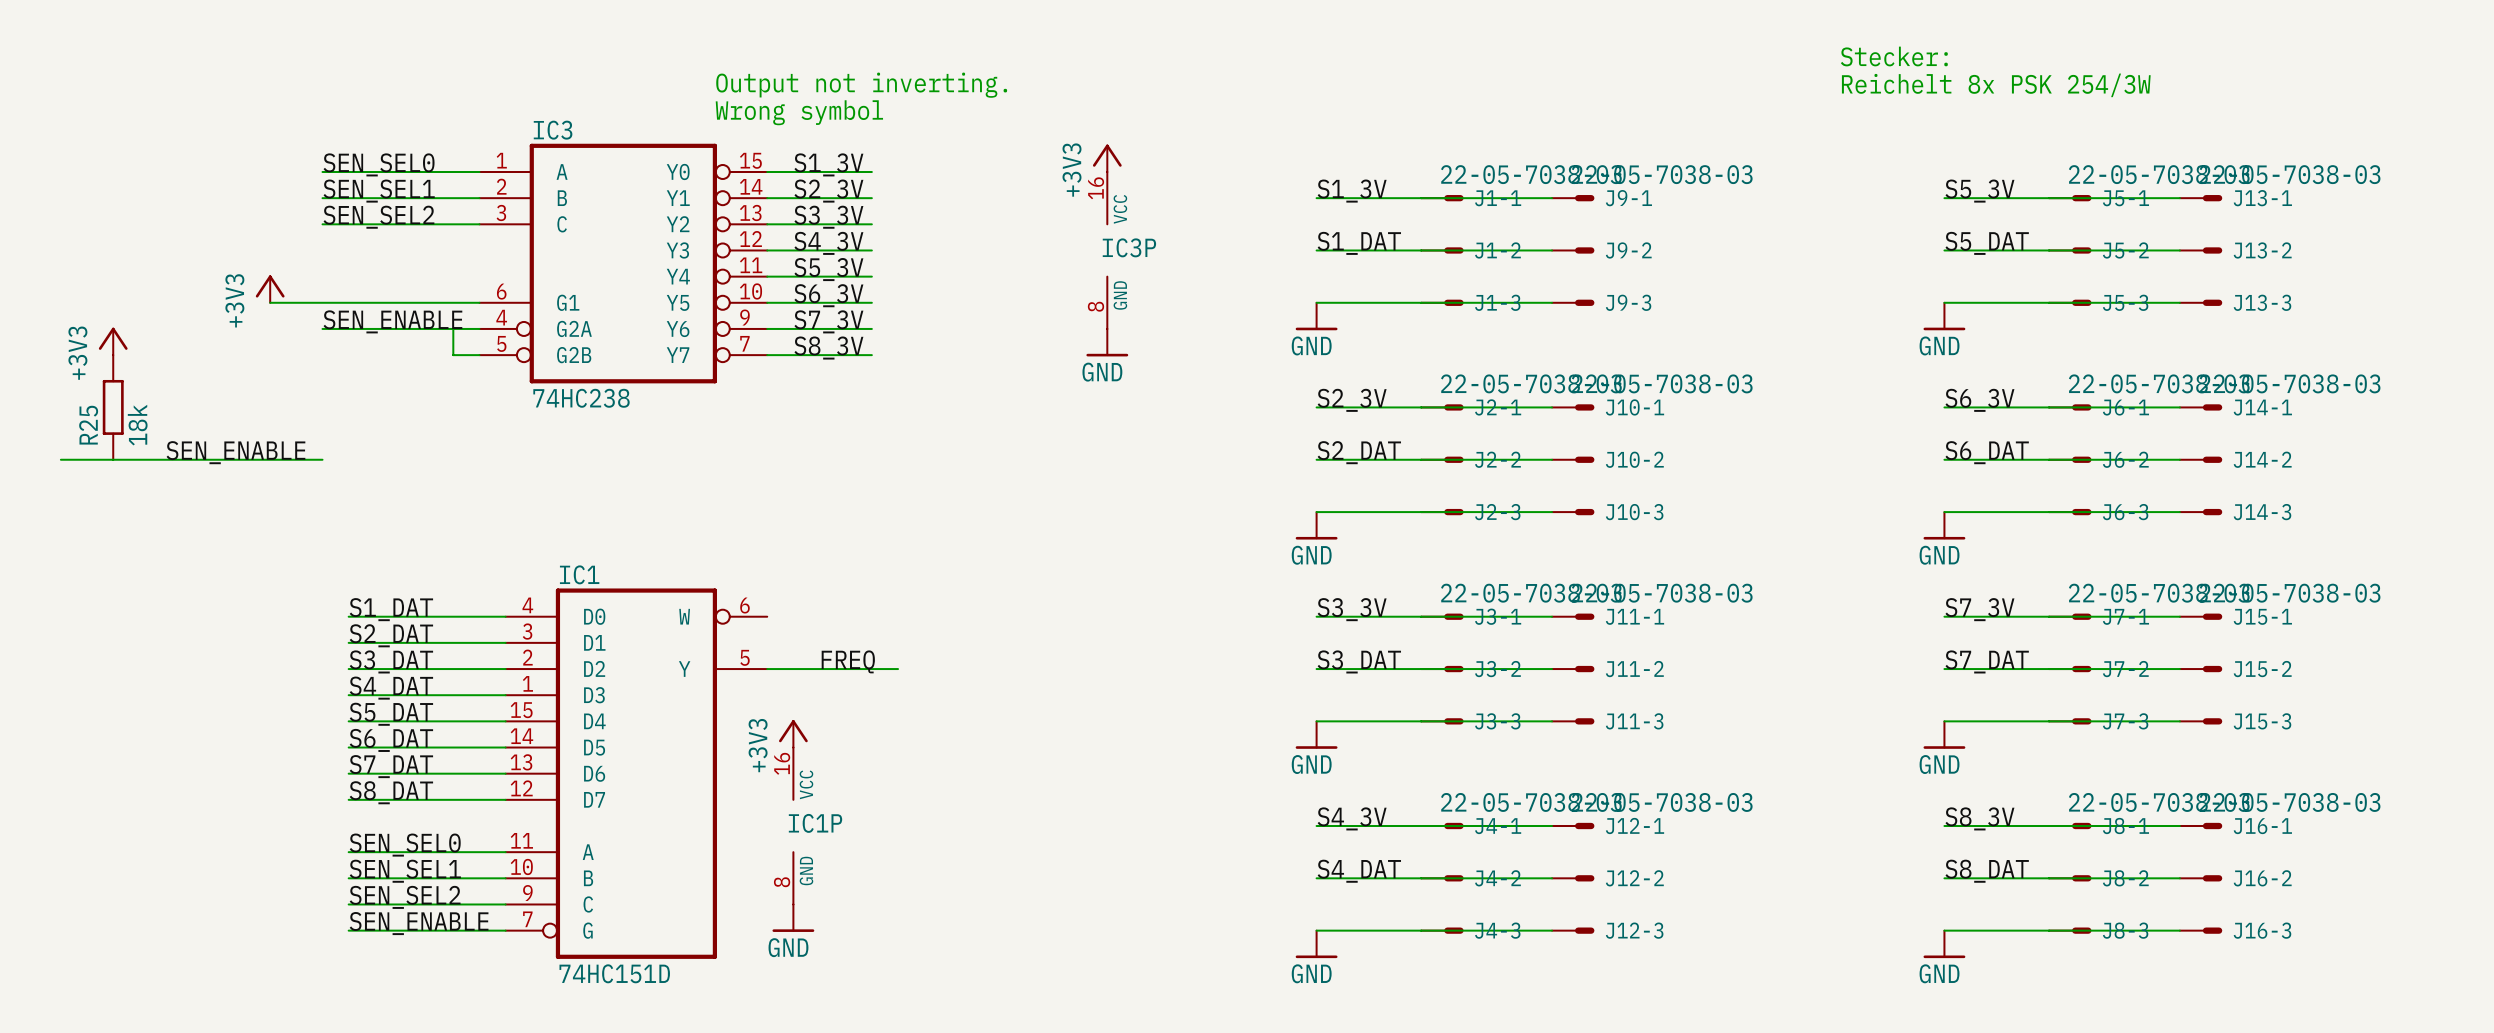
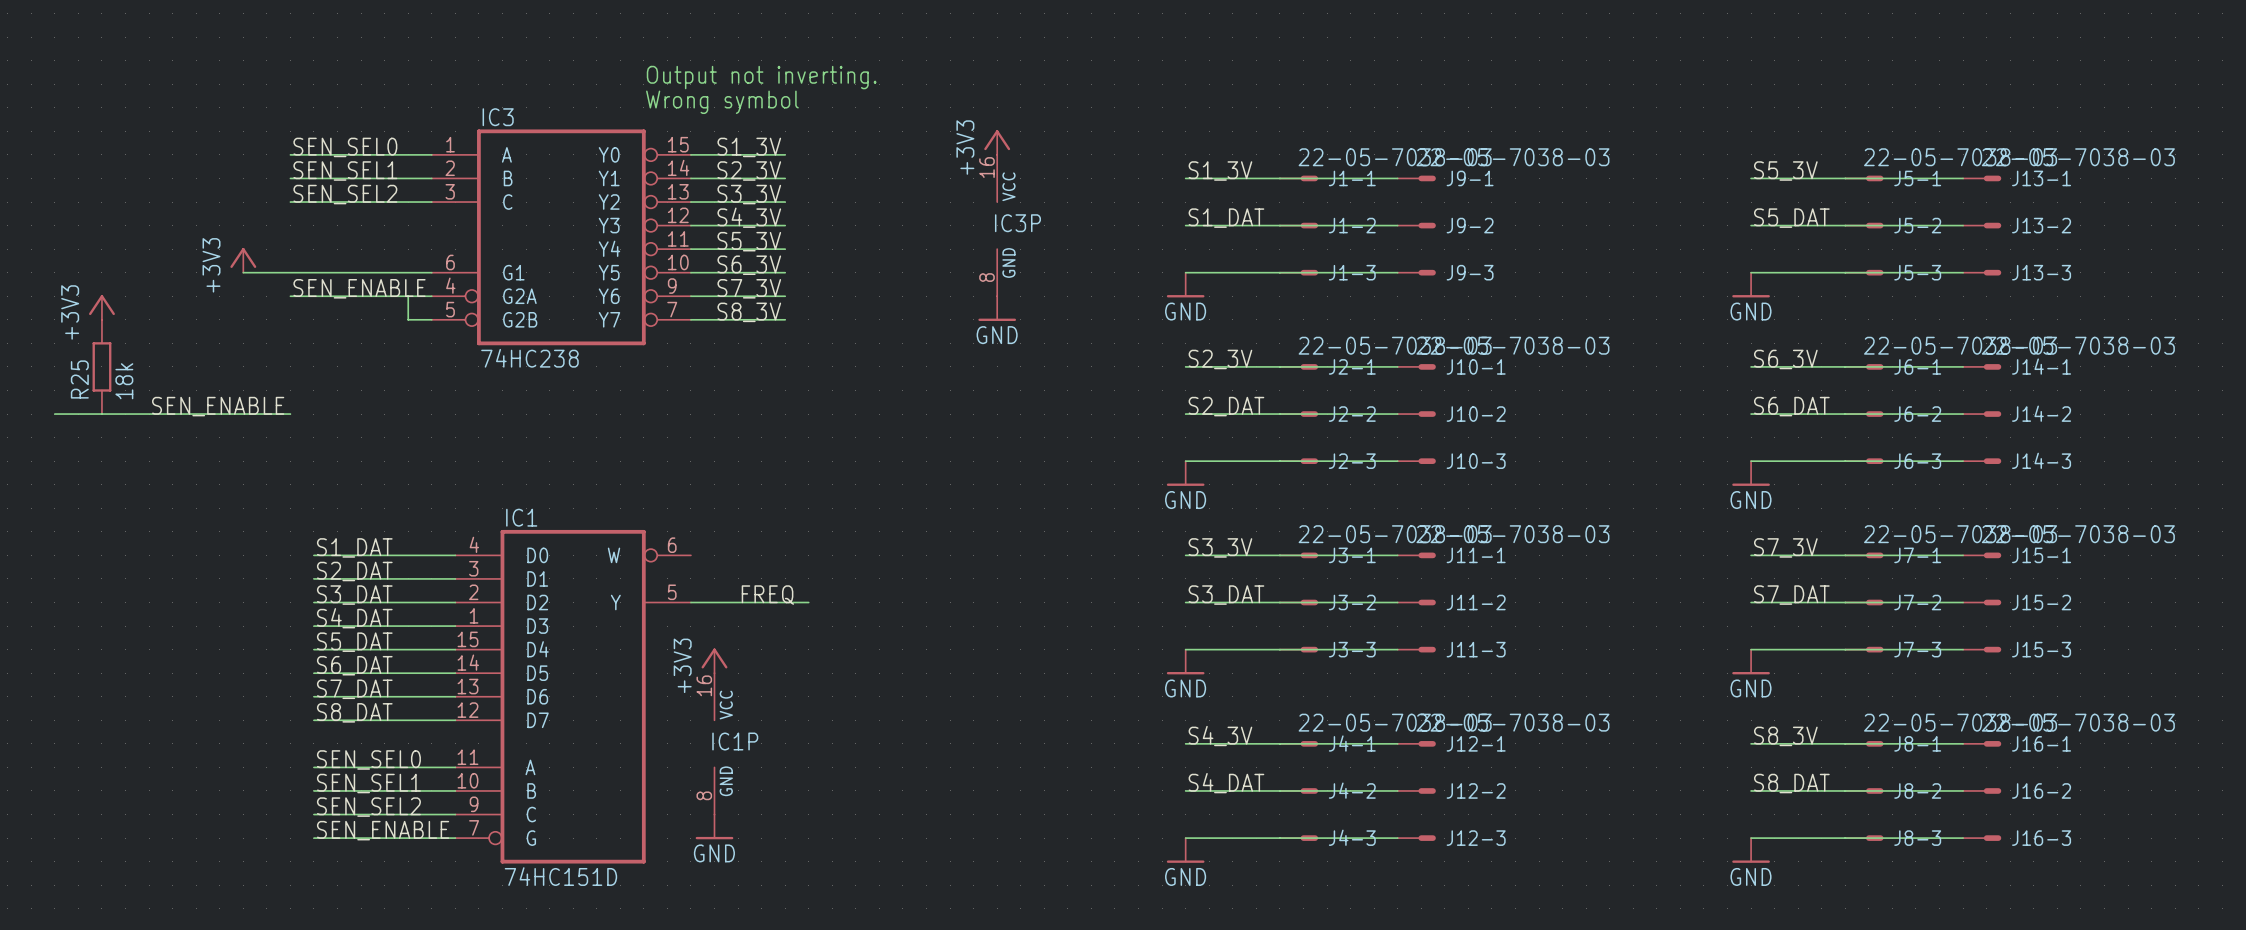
text: Stecker: (1894, 56) -> none
text: Reichelt 8x PSK 254/3W (1996, 85) -> none

